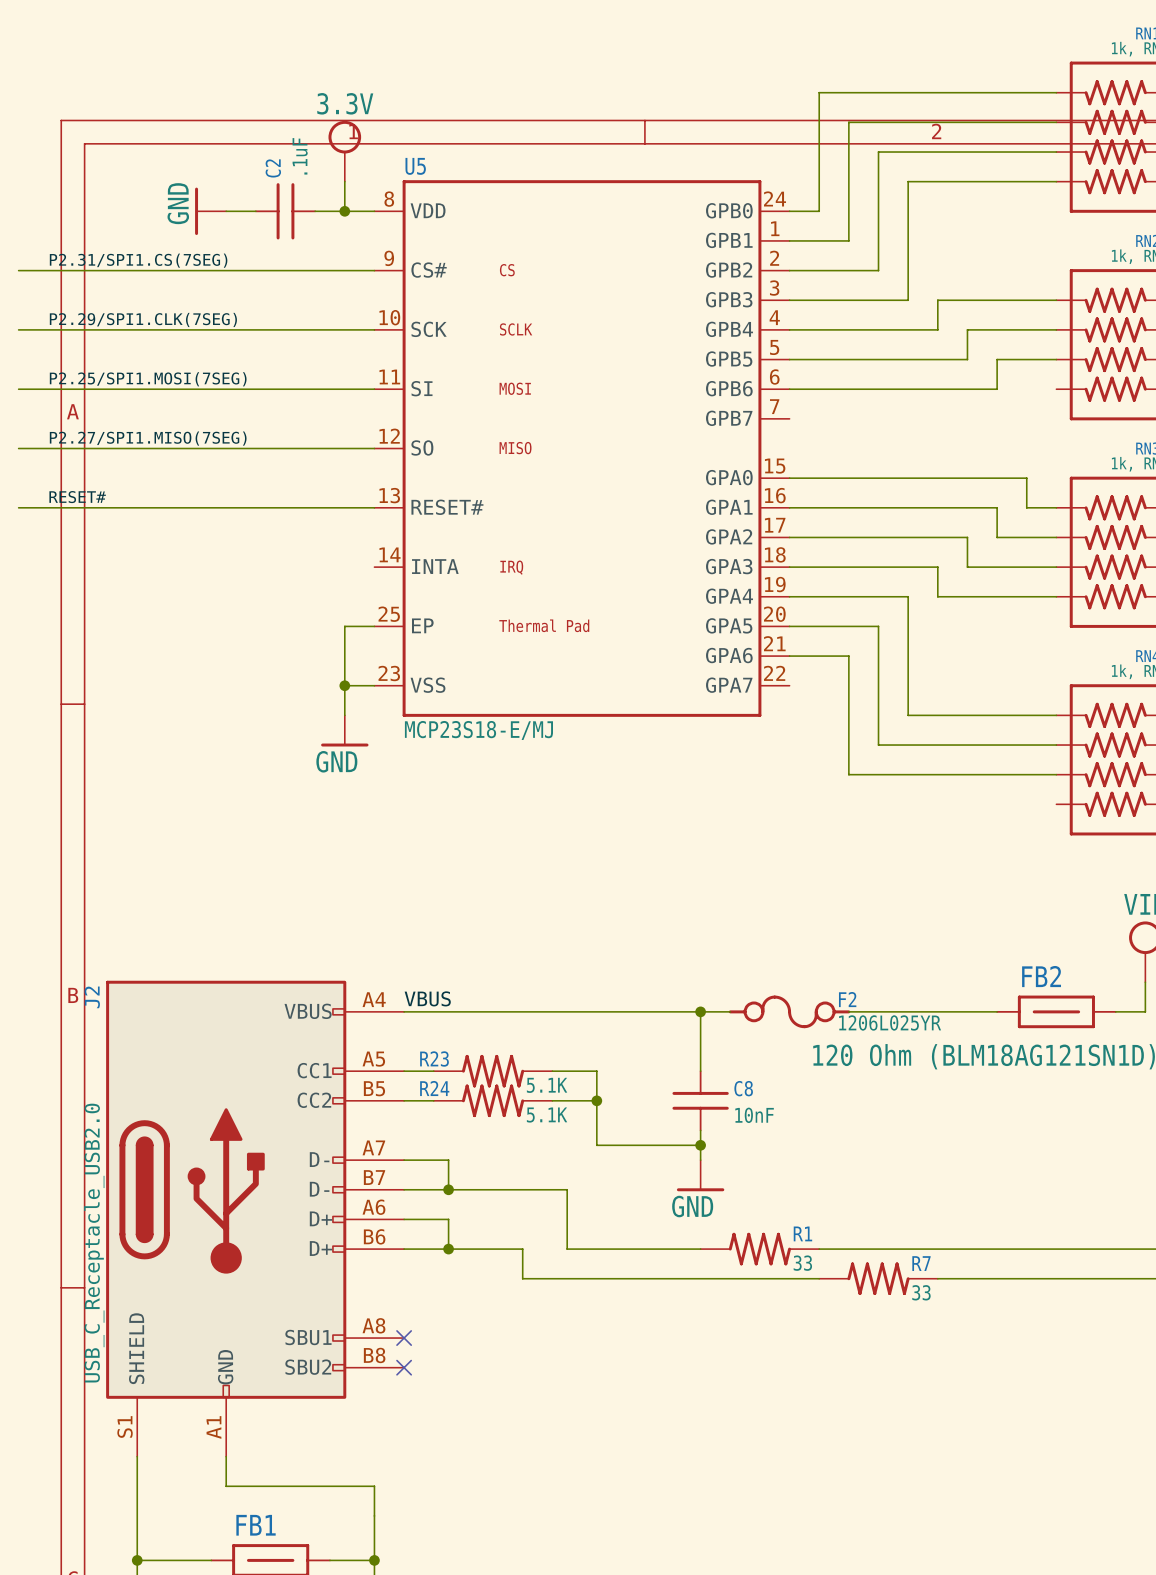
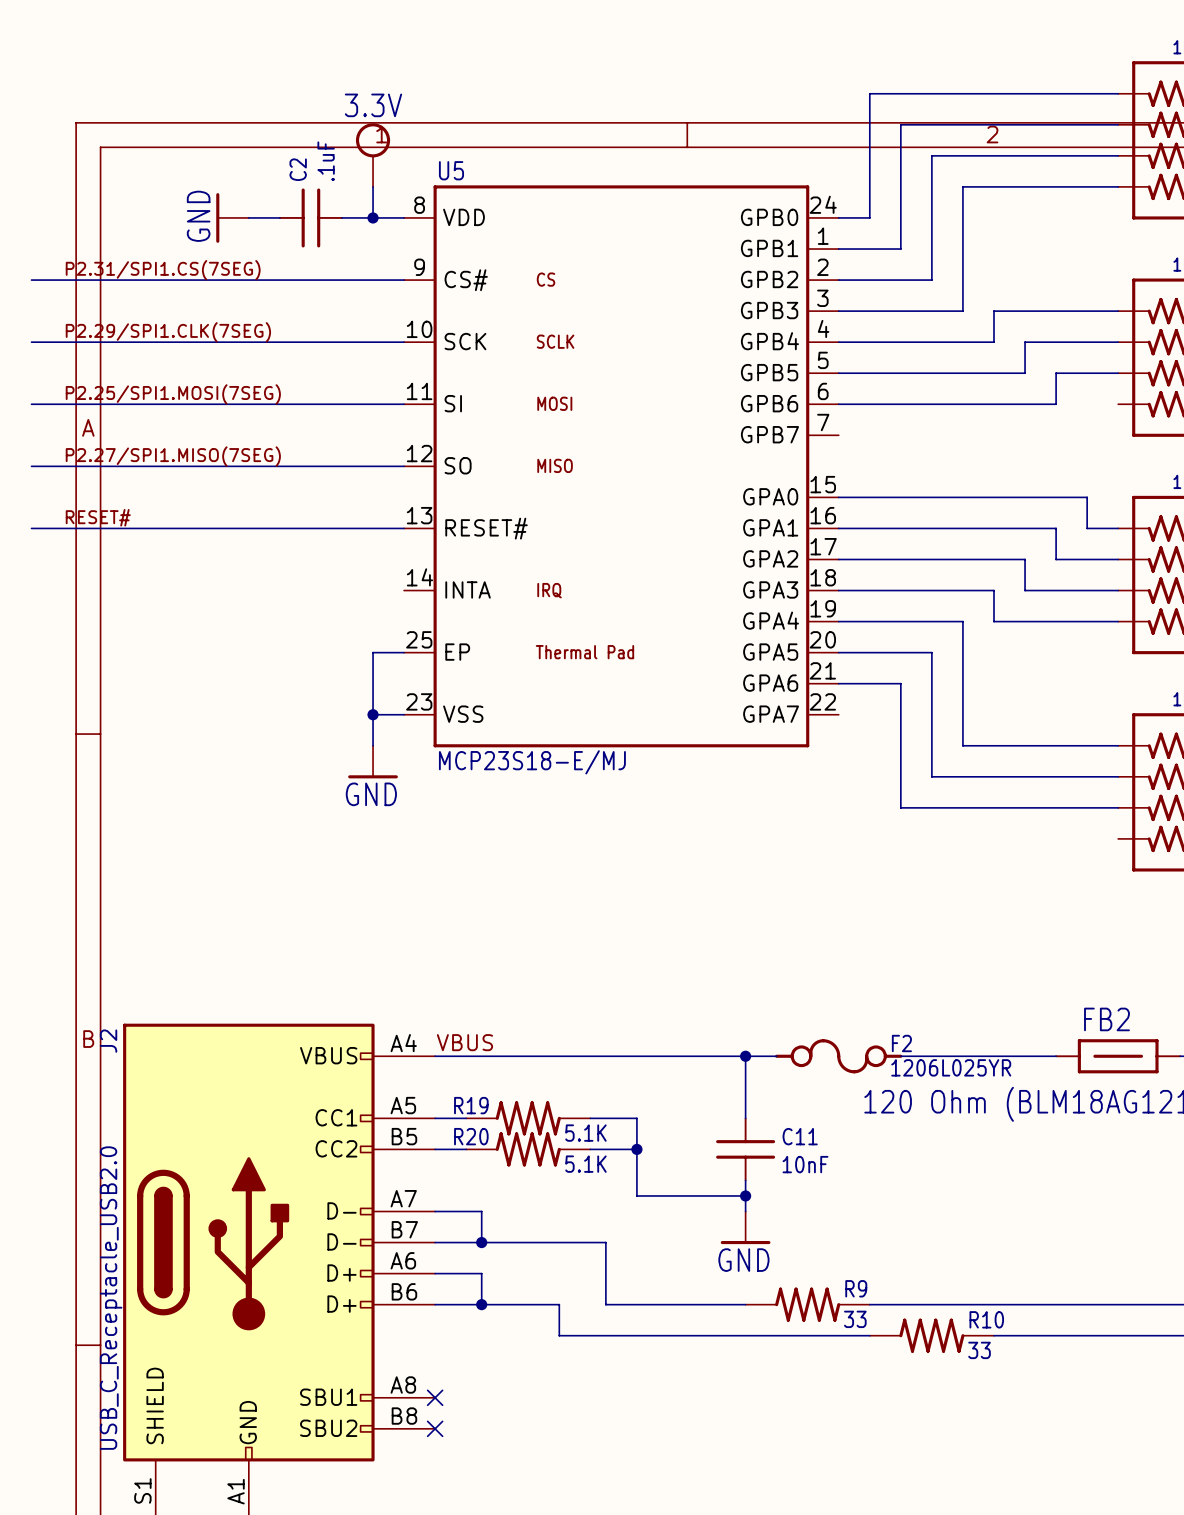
R23 name: R23 (434, 1058) -> R19 (471, 1105)
R24 name: R24 (434, 1088) -> R20 (471, 1136)
C8 name: C8 (743, 1088) -> C11 (800, 1136)
R1 name: R1 (802, 1233) -> R9 (856, 1288)
R7 name: R7 (921, 1263) -> R10 (986, 1319)

